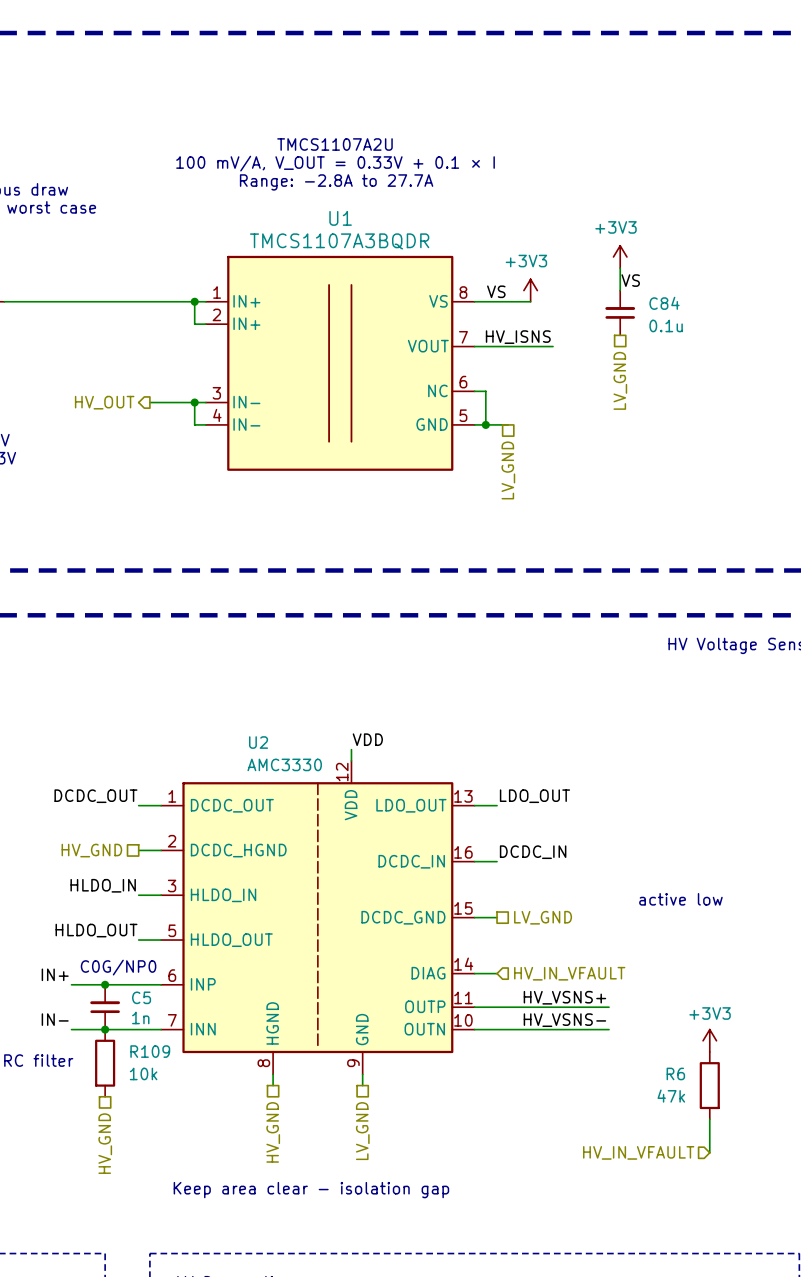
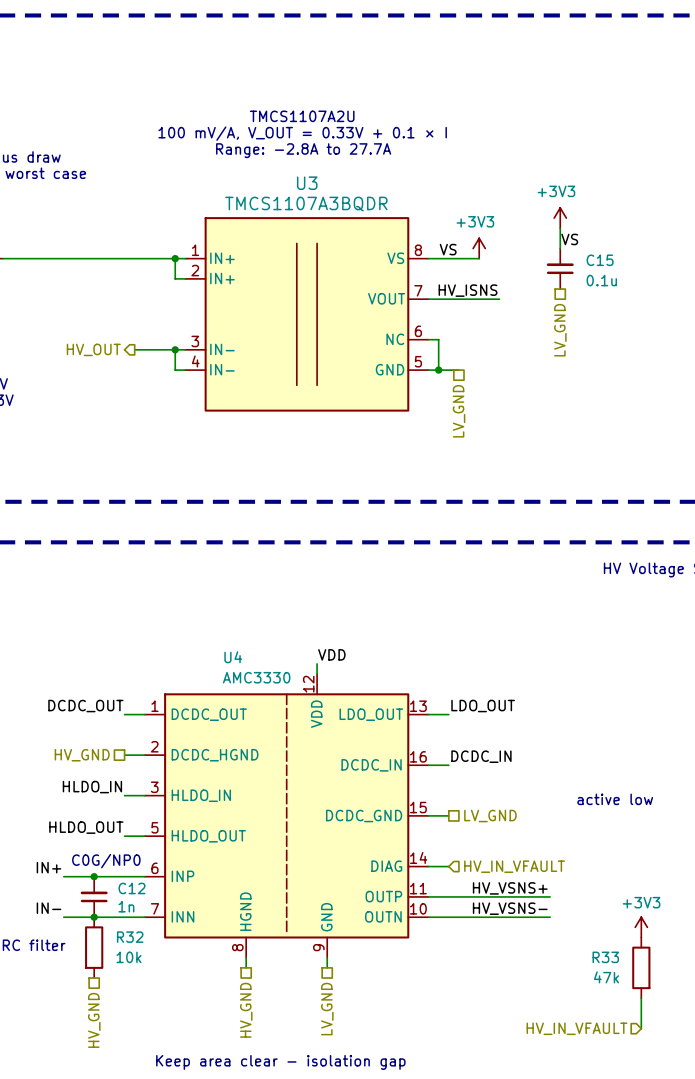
U1 name: U1 (340, 218) -> U3 (307, 183)
C84 name: C84 (664, 303) -> C15 (600, 260)
U2 name: U2 (258, 742) -> U4 (233, 657)
C5 name: C5 (141, 997) -> C12 (131, 888)
R109 name: R109 (150, 1051) -> R32 (130, 937)
R6 name: R6 (675, 1073) -> R33 (605, 957)

